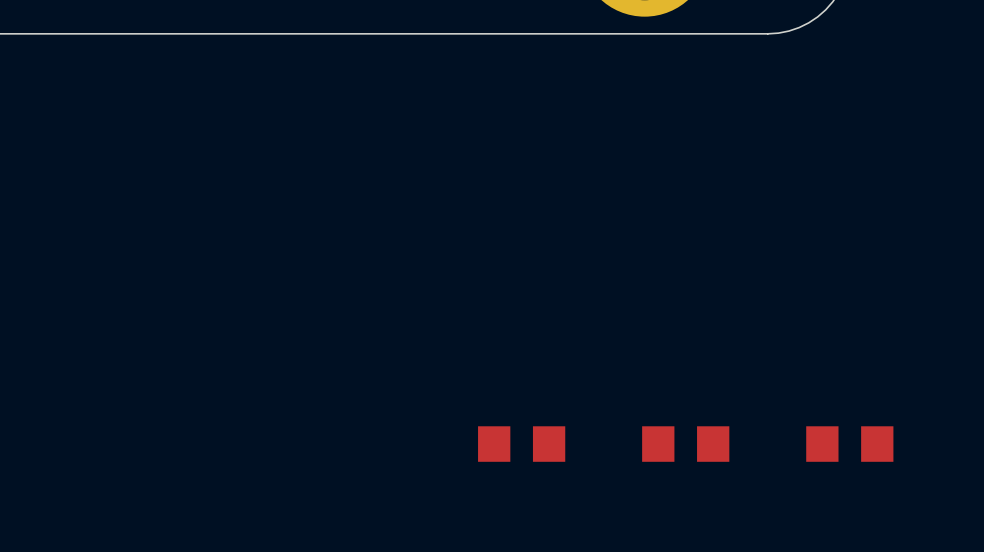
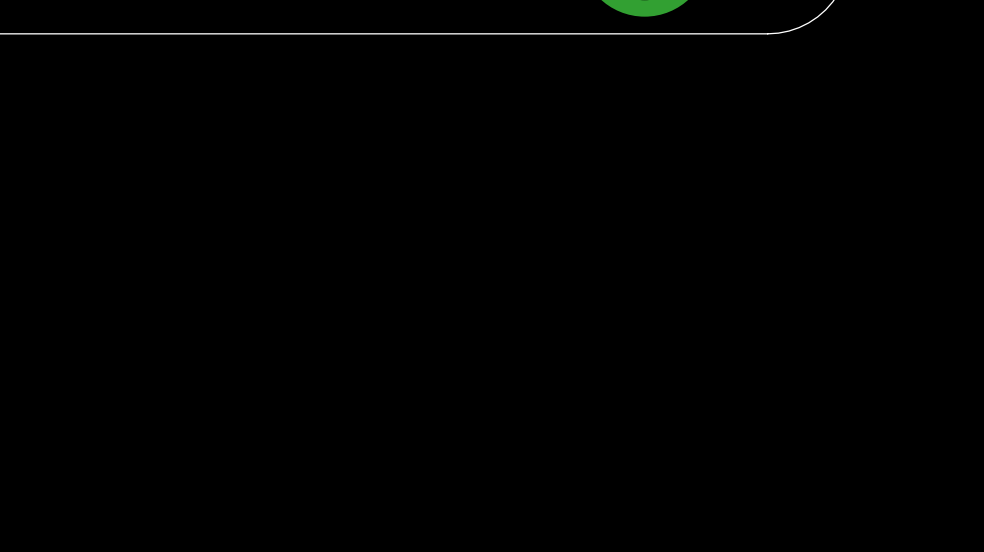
part: (521, 444) -> none
part: (685, 444) -> none
part: (849, 444) -> none

